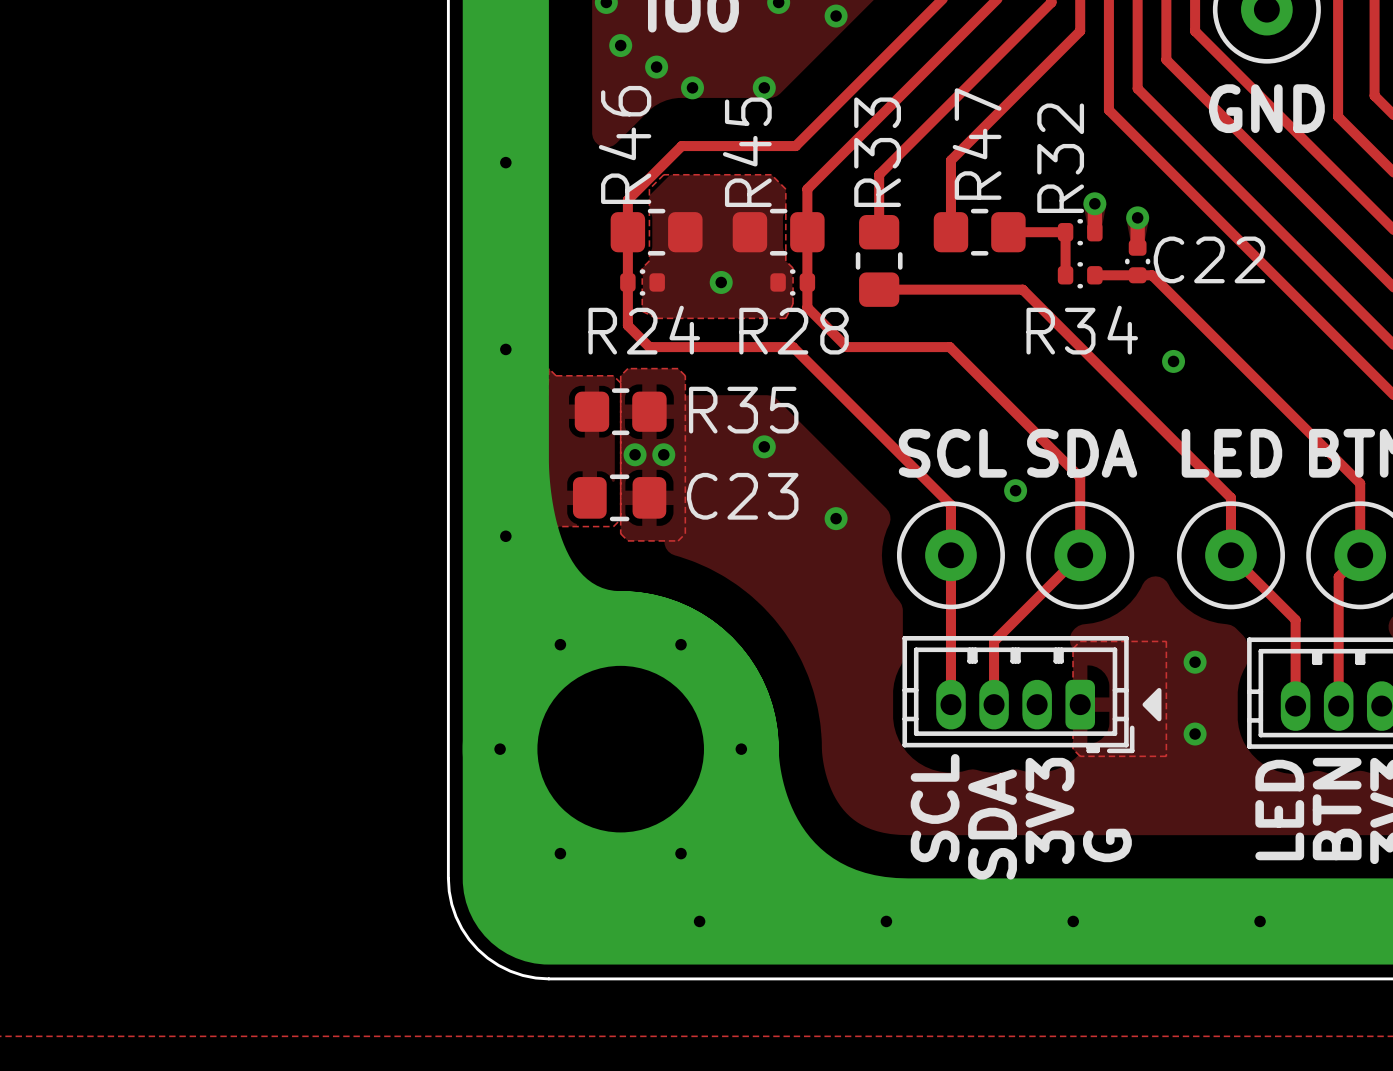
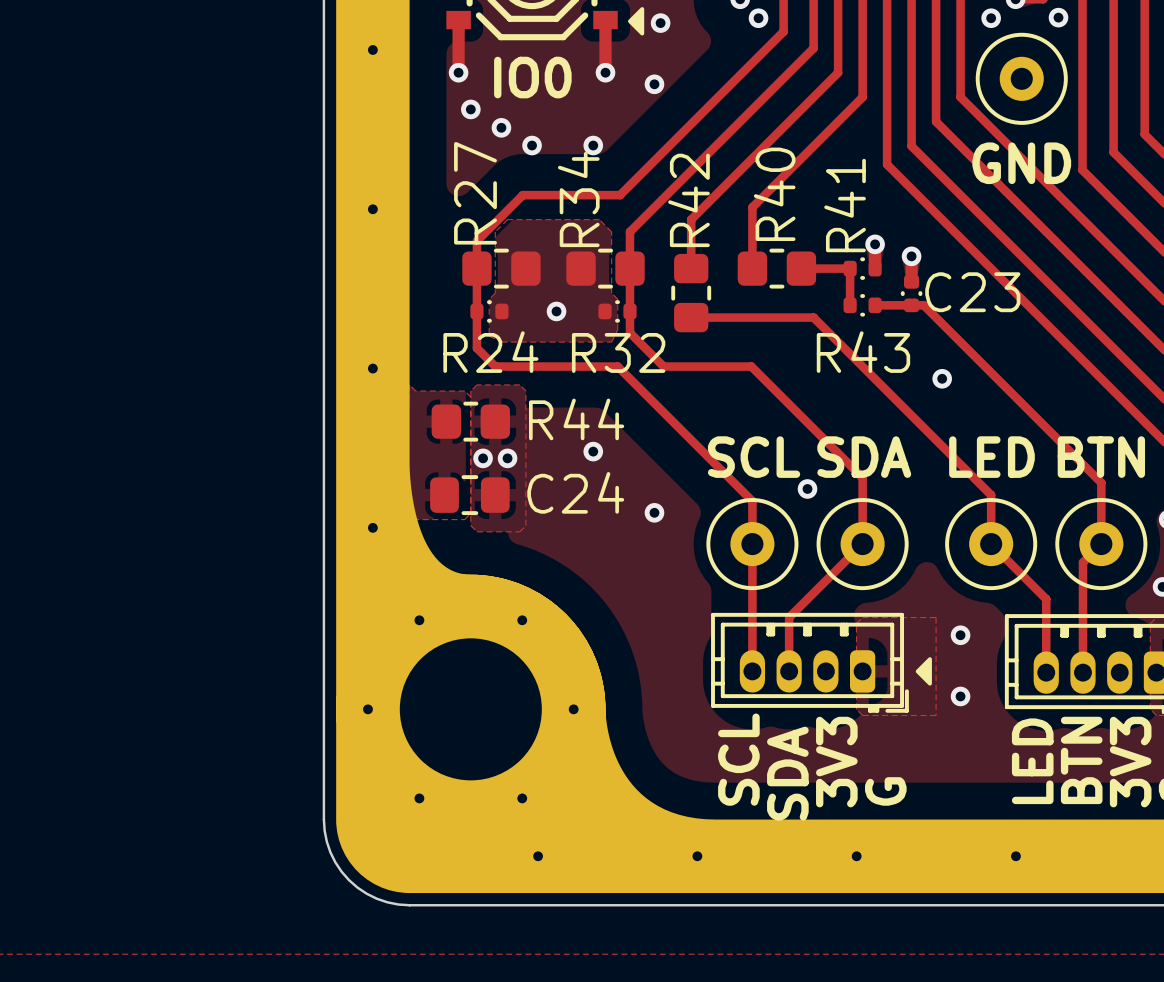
R46 name: R46 (625, 144) -> R27 (475, 193)
R47 name: R47 (977, 144) -> R40 (774, 194)
R45 name: R45 (747, 152) -> R34 (578, 199)
R33 name: R33 (877, 152) -> R42 (688, 200)
R32 name: R32 (1060, 158) -> R41 (845, 205)
C22 name: C22 (1209, 259) -> C23 (972, 292)
R34 name: R34 (1082, 330) -> R43 (863, 352)
R28 name: R28 (794, 331) -> R32 (618, 352)
R35 name: R35 (743, 410) -> R44 (576, 419)
C23 name: C23 (742, 496) -> C24 (575, 492)

